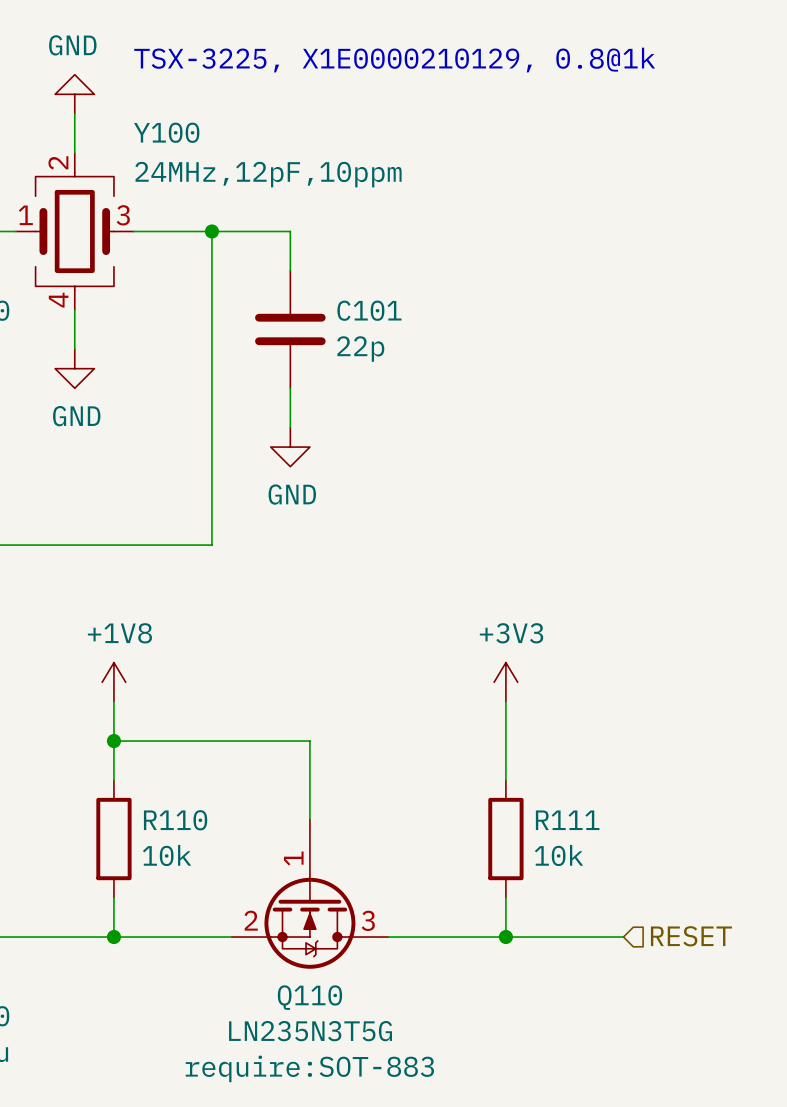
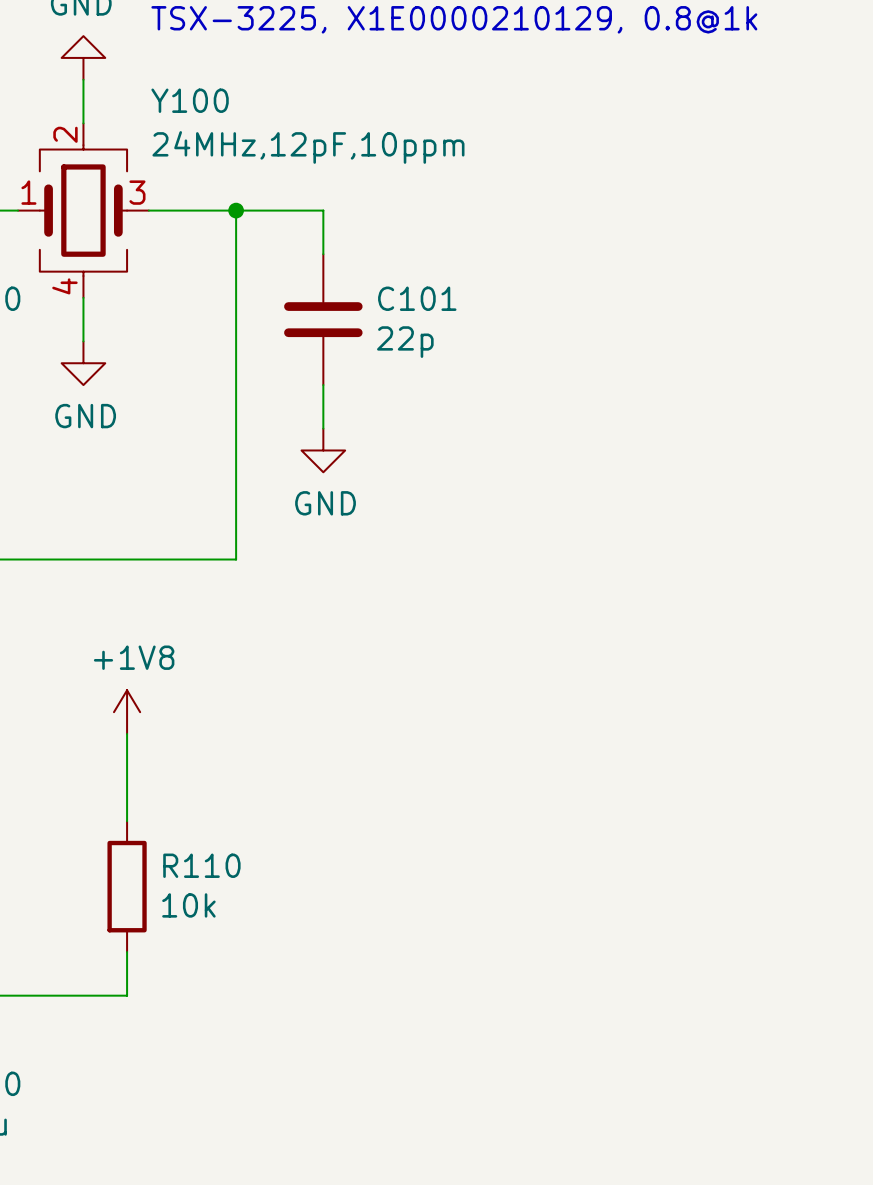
power symbol: +3V3 (505, 682) -> none
wire: (505, 701) (505, 780) -> none
wire: (113, 741) (309, 741) (309, 819) -> none
junction: (113, 741) -> none
R111: 10k (505, 839) -> none
Q110: LN235N3T5G (309, 894) -> none
wire: (505, 897) (505, 937) -> none
hierarchical label: RESET (691, 936) -> none
wire: (113, 937) (231, 937) -> none
junction: (113, 937) -> none
wire: (388, 937) (623, 937) -> none
junction: (505, 937) -> none

